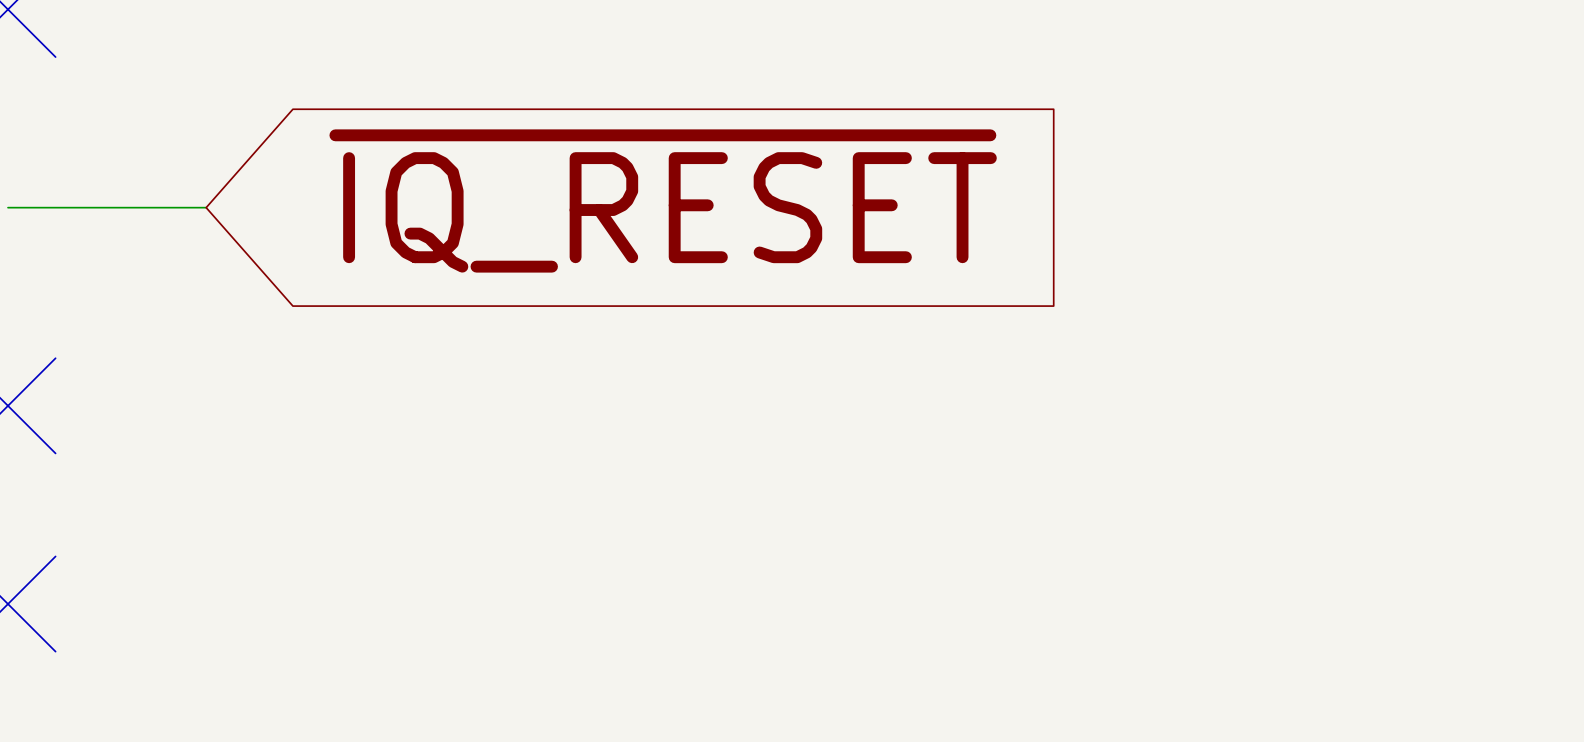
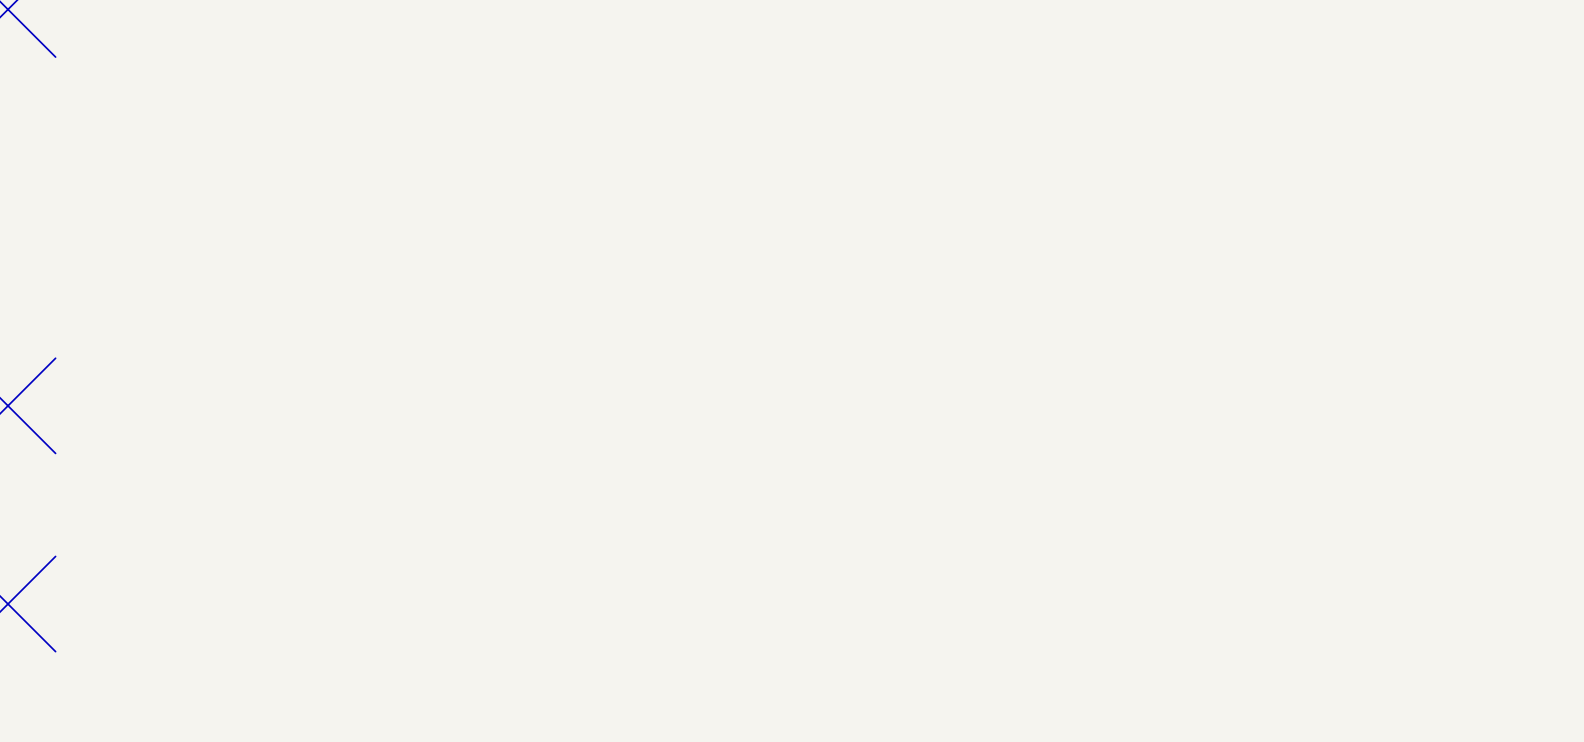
global label: ~{IQ_RESET} (663, 200) -> none
wire: (8, 207) (206, 207) -> none

